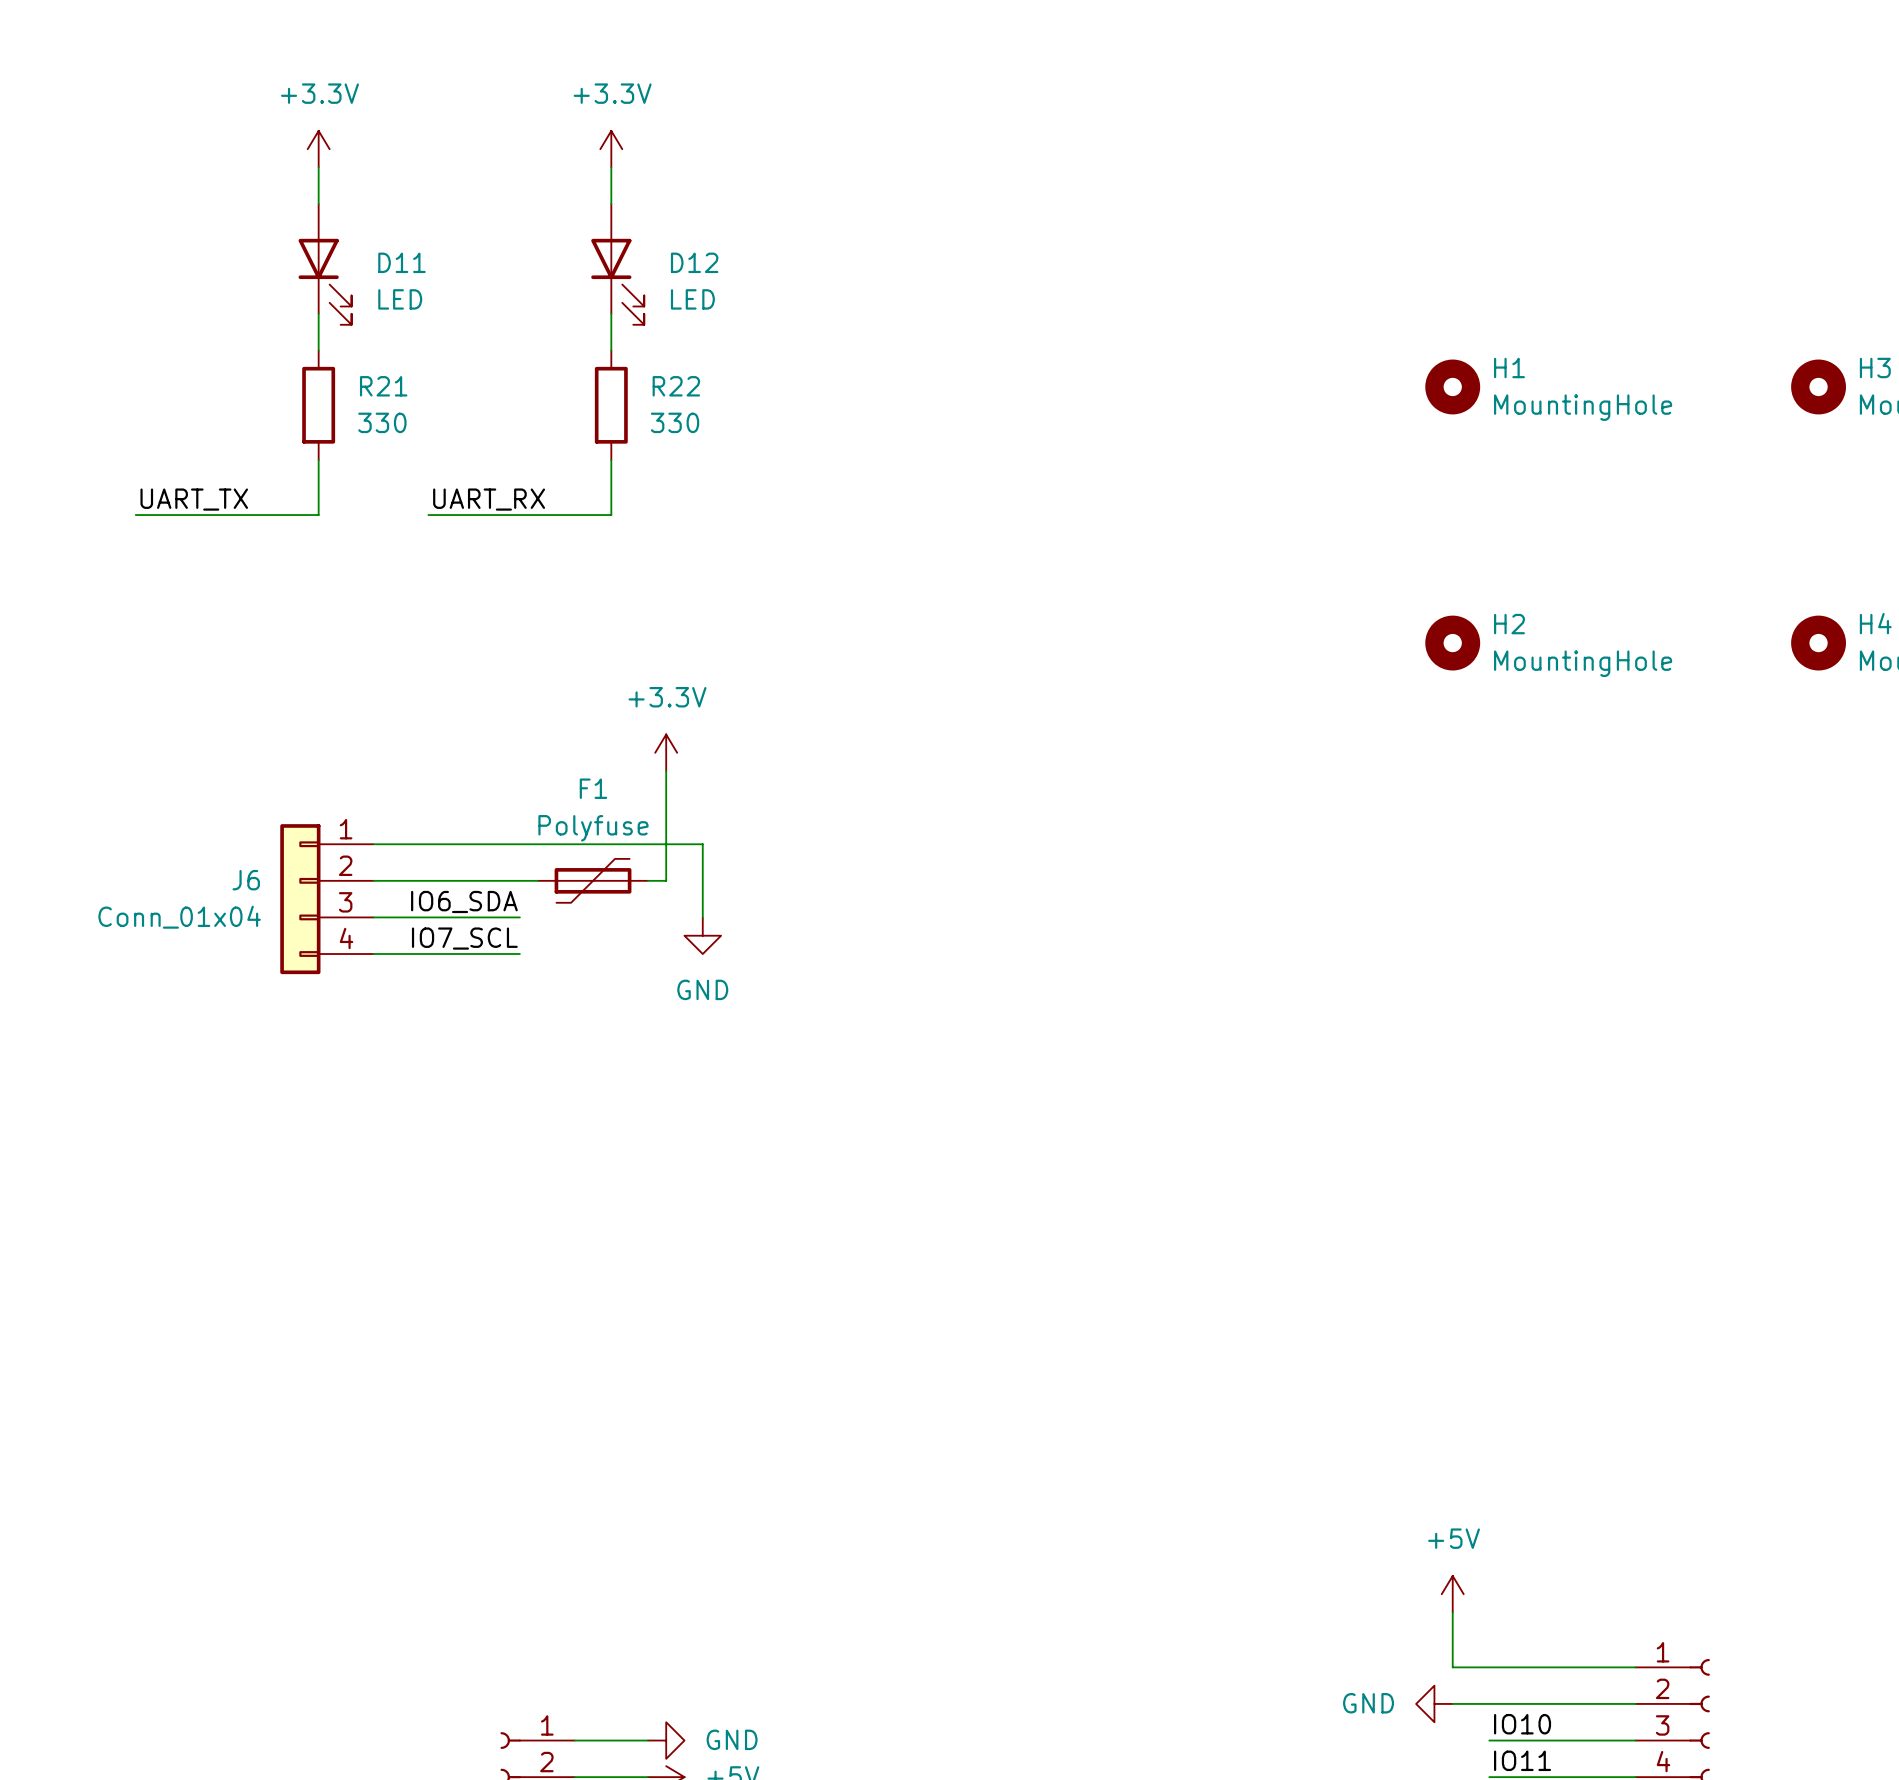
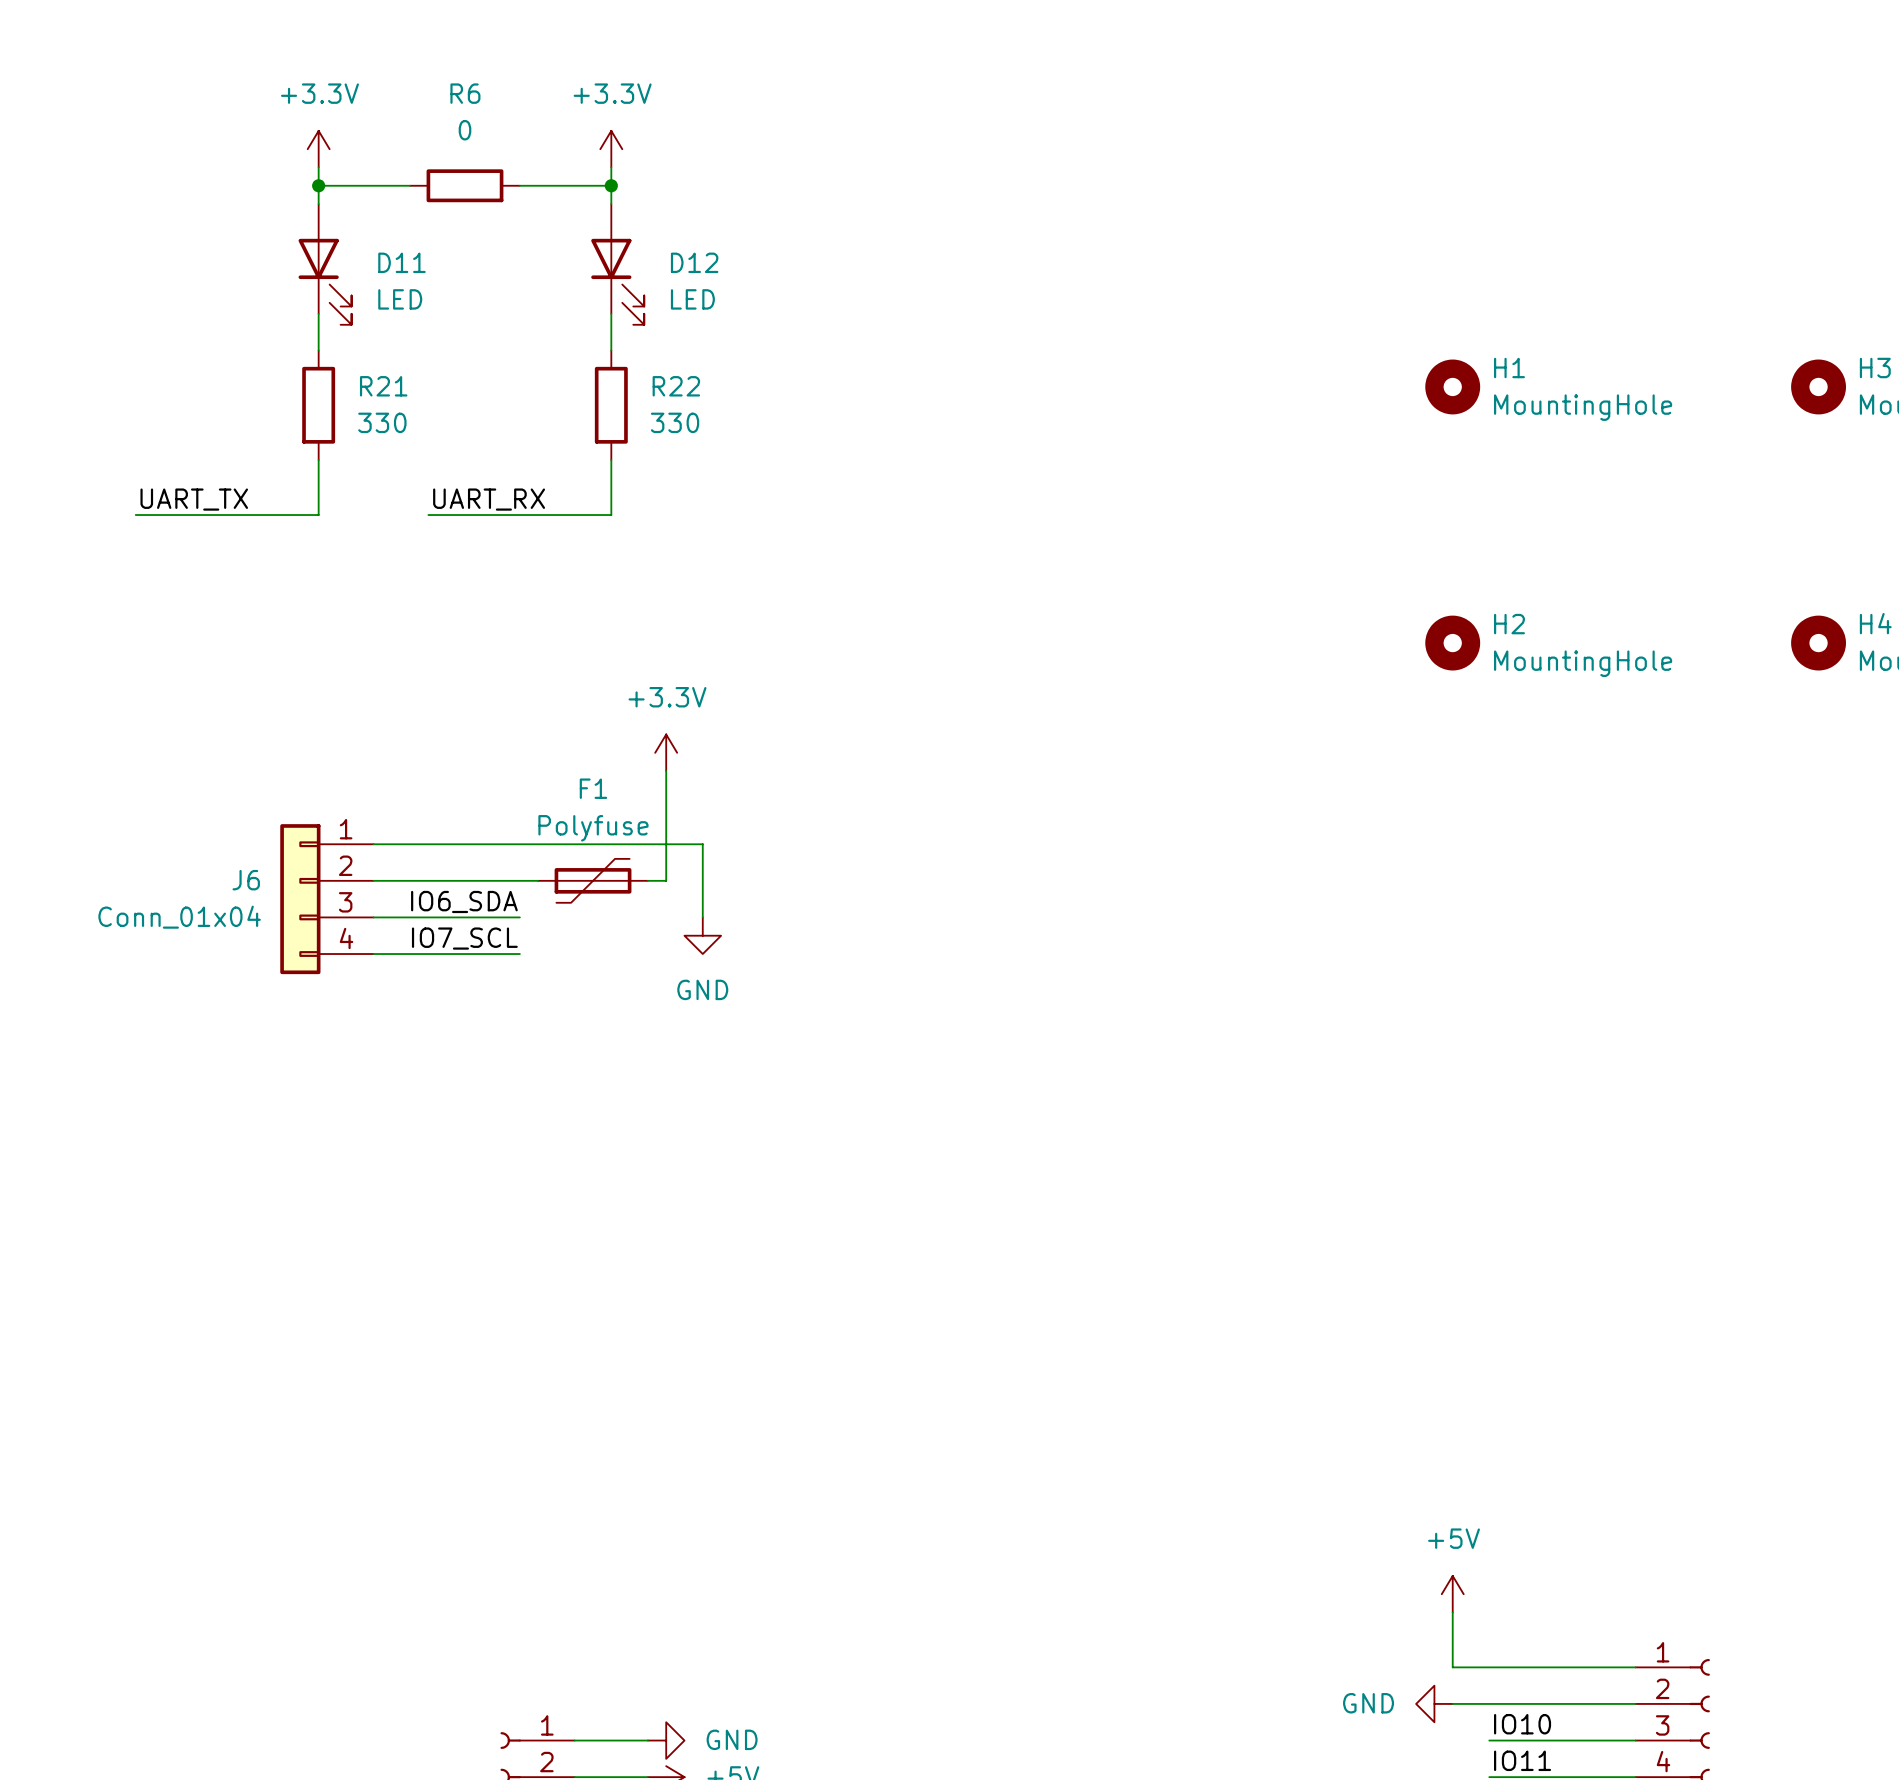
wire: none -> (318, 185) (410, 185)
junction: none -> (318, 185)
R6: none -> 0 (464, 185)
wire: none -> (519, 185) (611, 185)
junction: none -> (611, 185)

